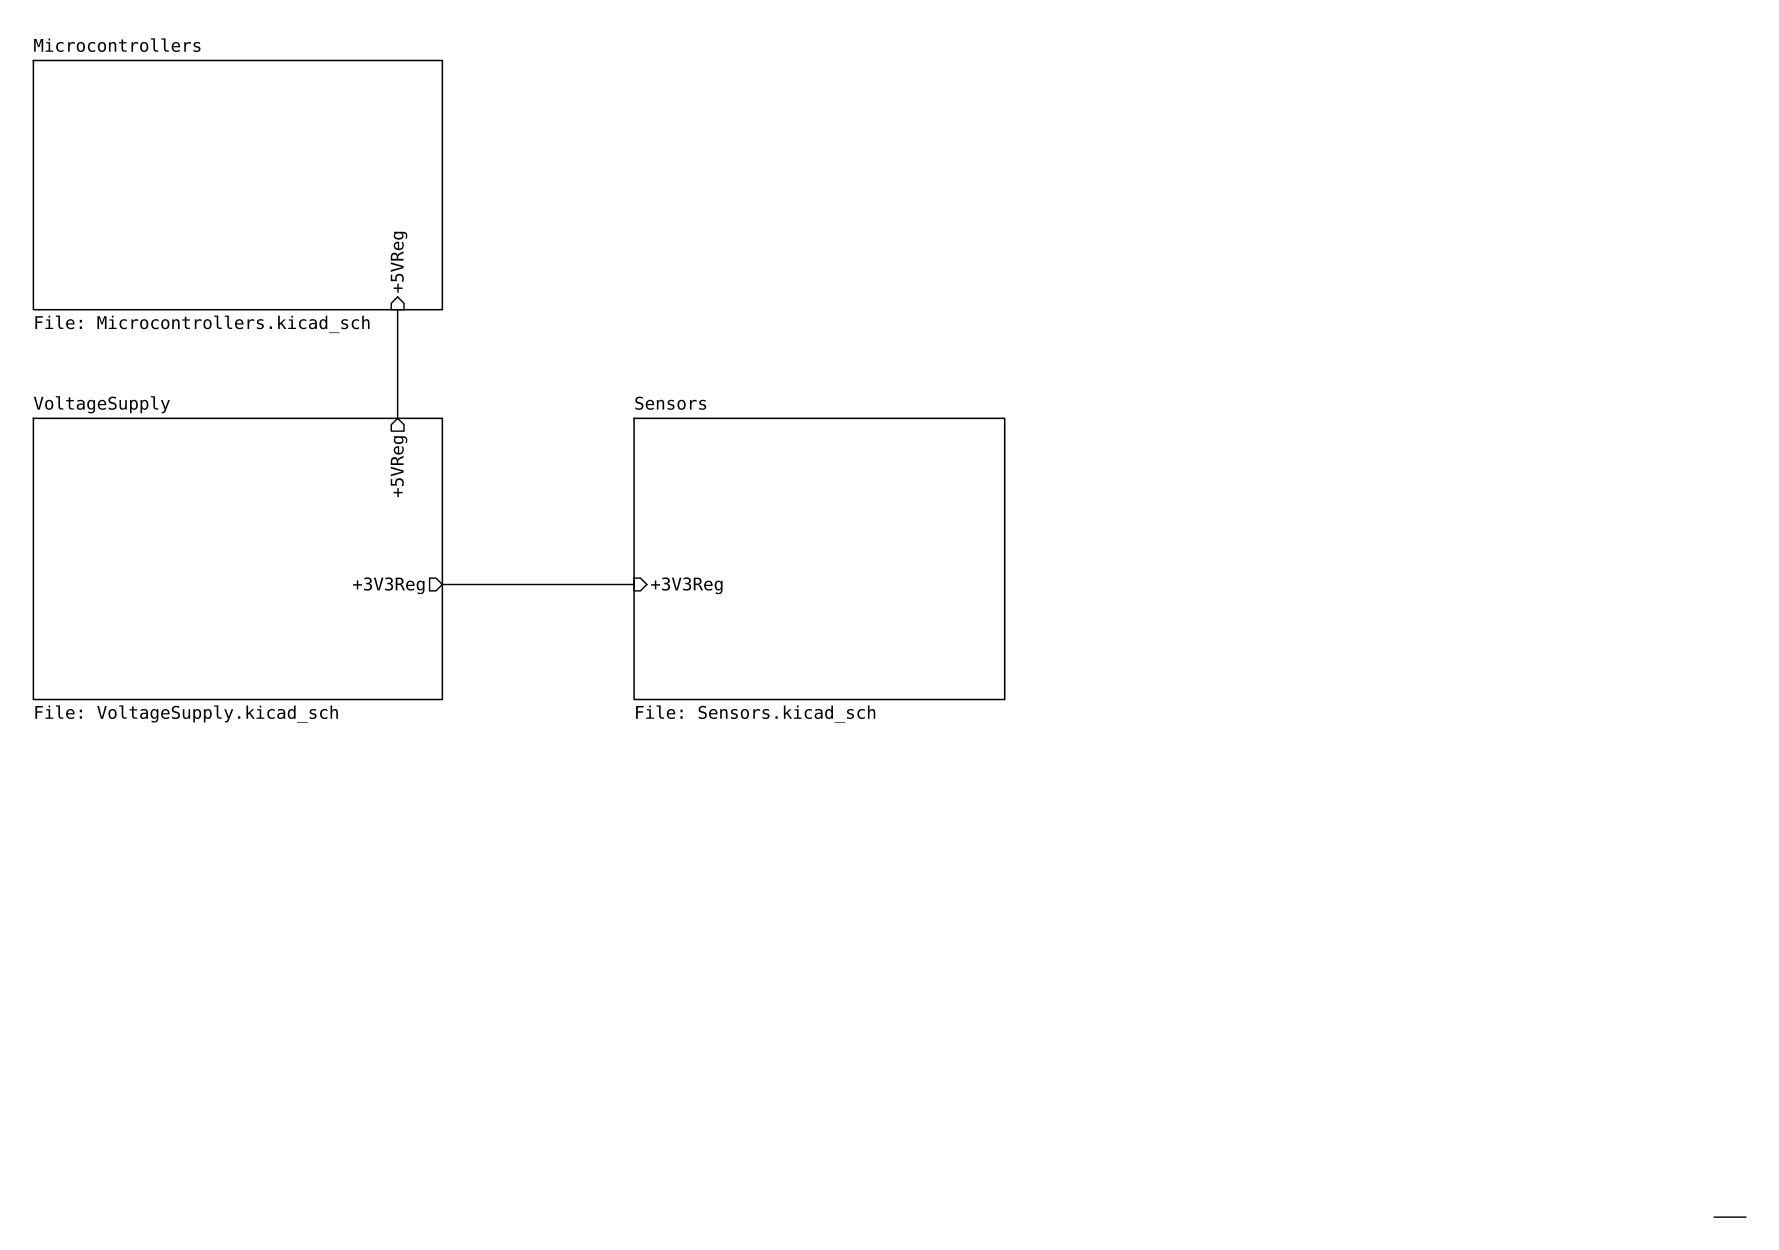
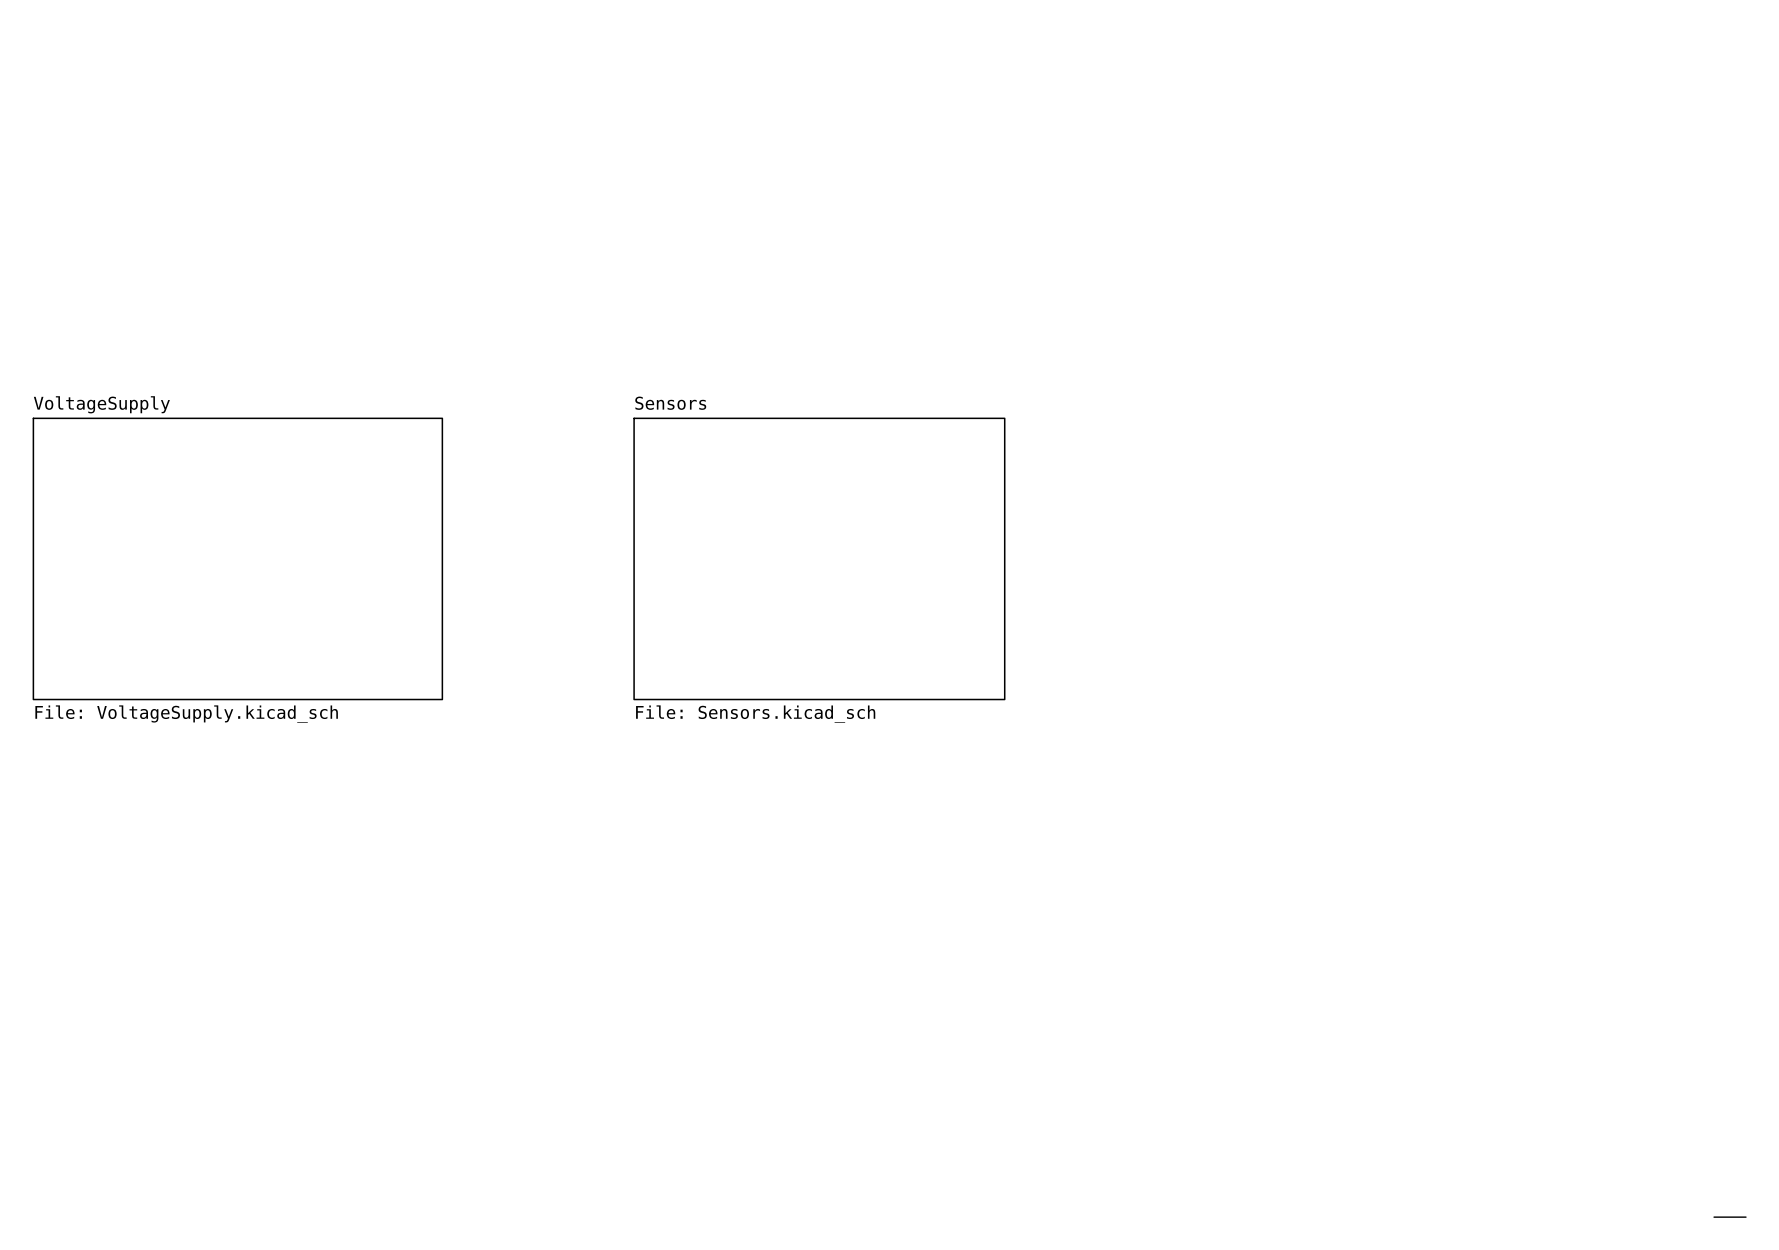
sheet Microcontrollers: File: Microcontrollers.kicad_sch (237, 185) -> none
sheet pin: +5VReg (399, 262) -> none
wire: (397, 309) (397, 418) -> none
sheet pin: +5VReg (399, 466) -> none
wire: (442, 584) (634, 584) -> none
sheet pin: +3V3Reg (388, 585) -> none
sheet pin: +3V3Reg (686, 585) -> none

